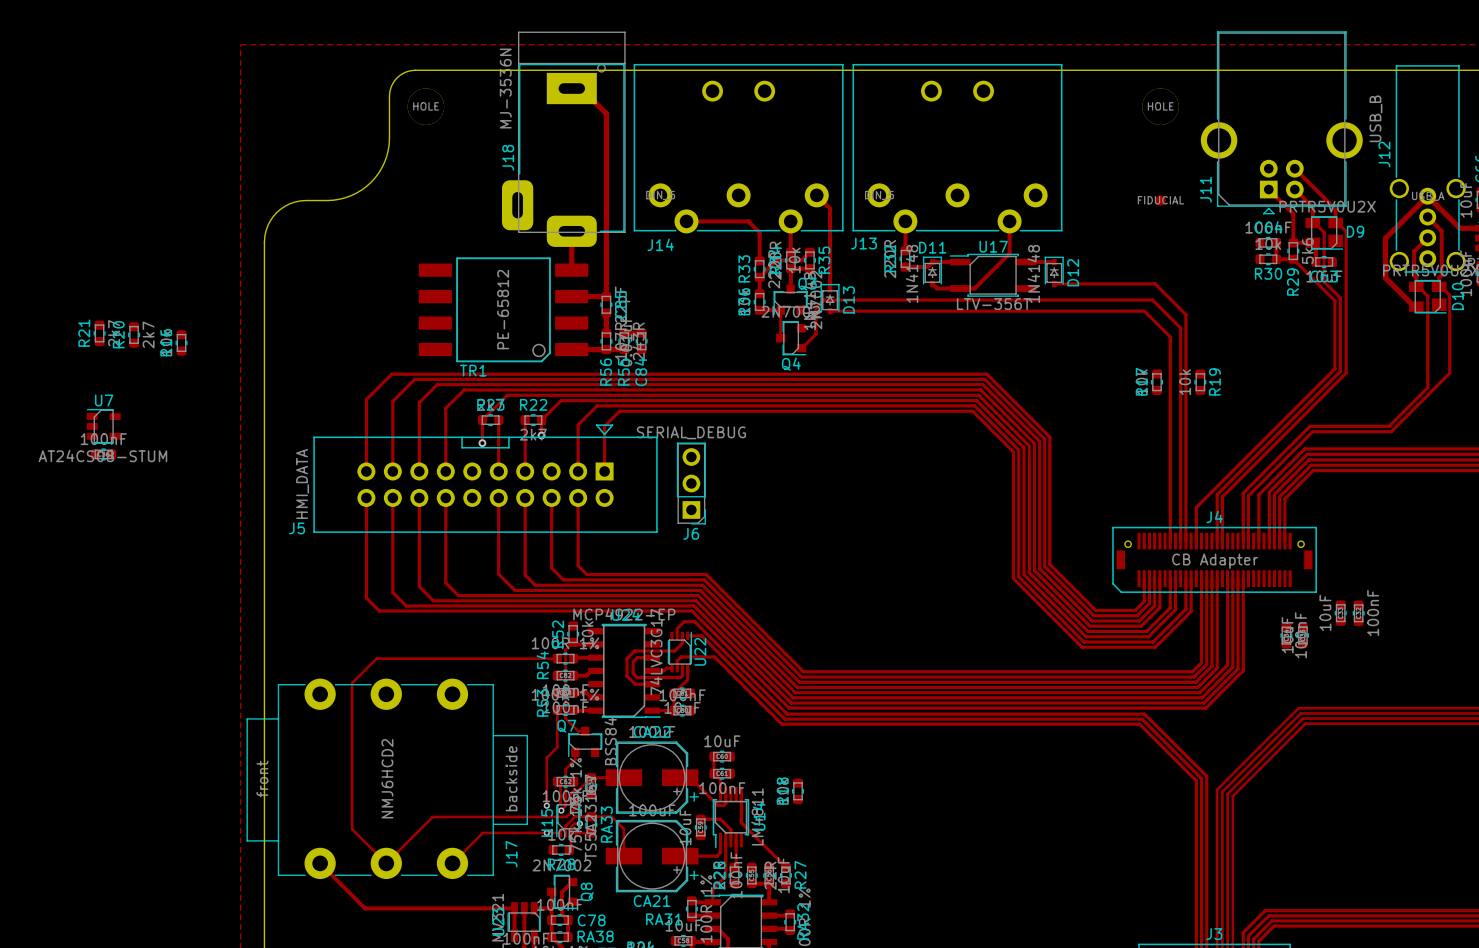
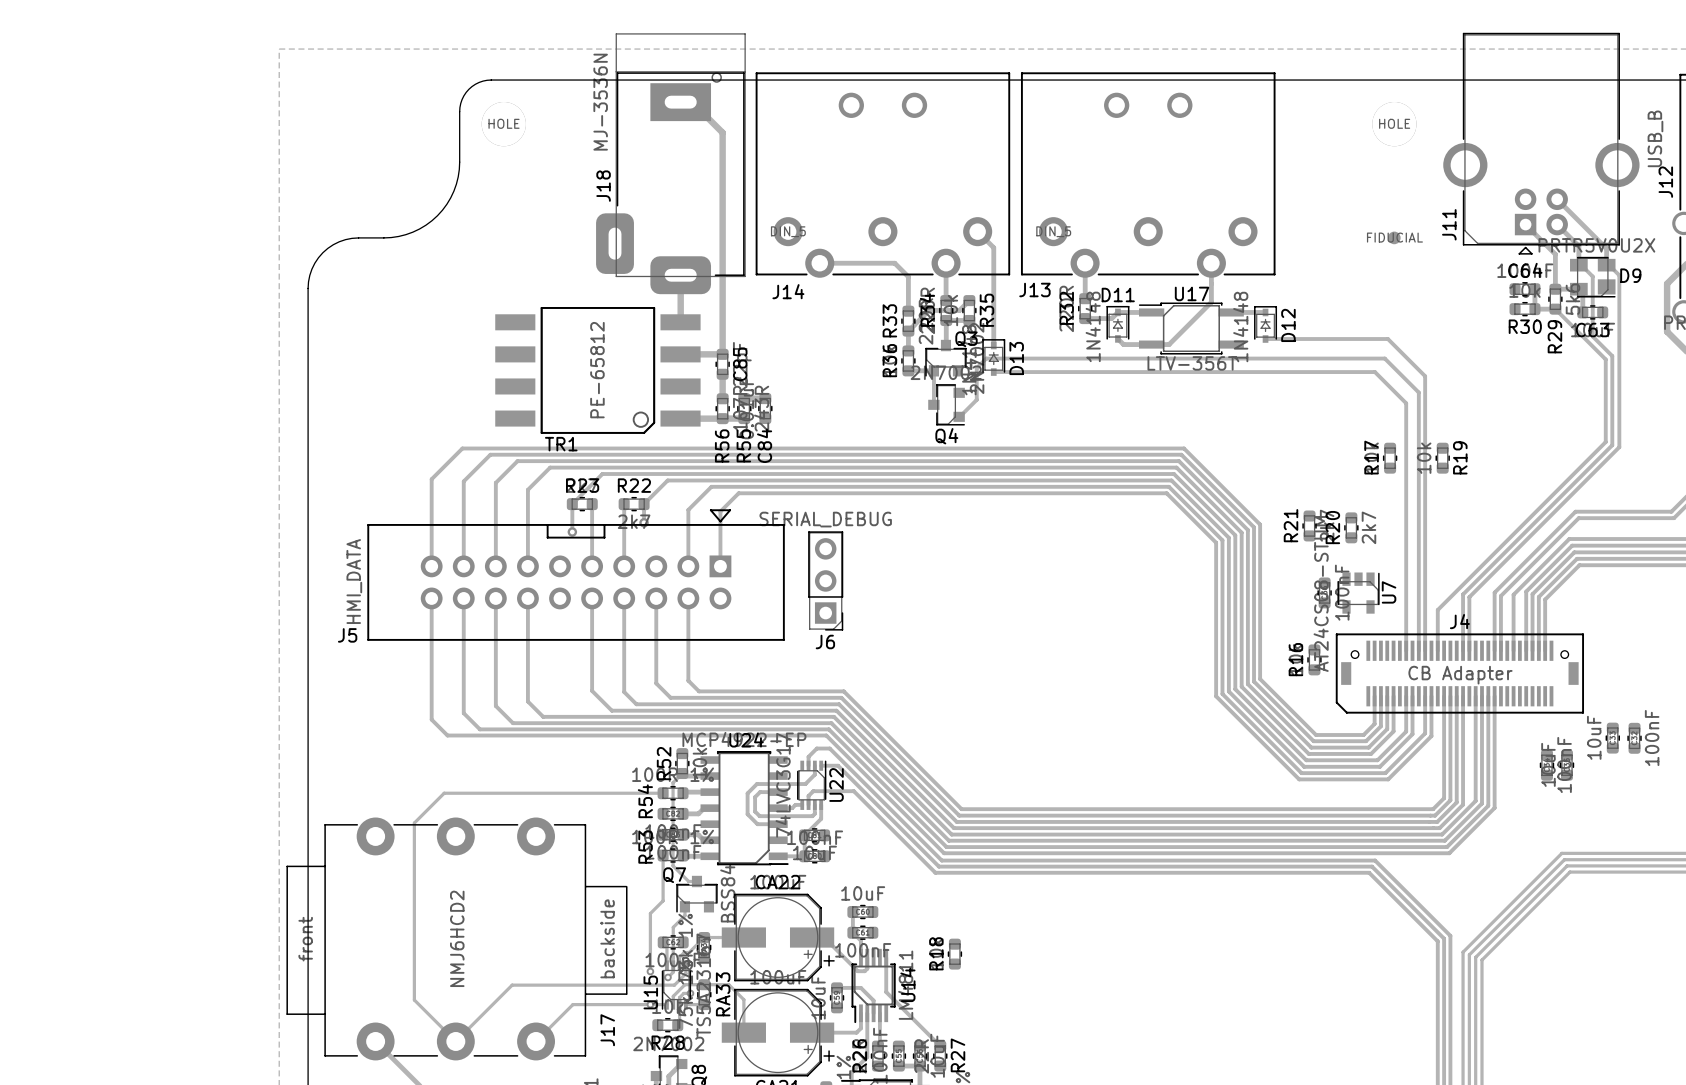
R21 position: (99, 333) -> (1309, 525)
R20 position: (134, 334) -> (1351, 527)
R16 position: (181, 342) -> (1314, 659)
U7 rotation: 0° (103, 426) -> 90° clockwise (1358, 593)
U7 position: (103, 426) -> (1358, 593)
part rotation: 0° (103, 454) -> 90° clockwise (1324, 592)
part position: (103, 454) -> (1324, 592)

